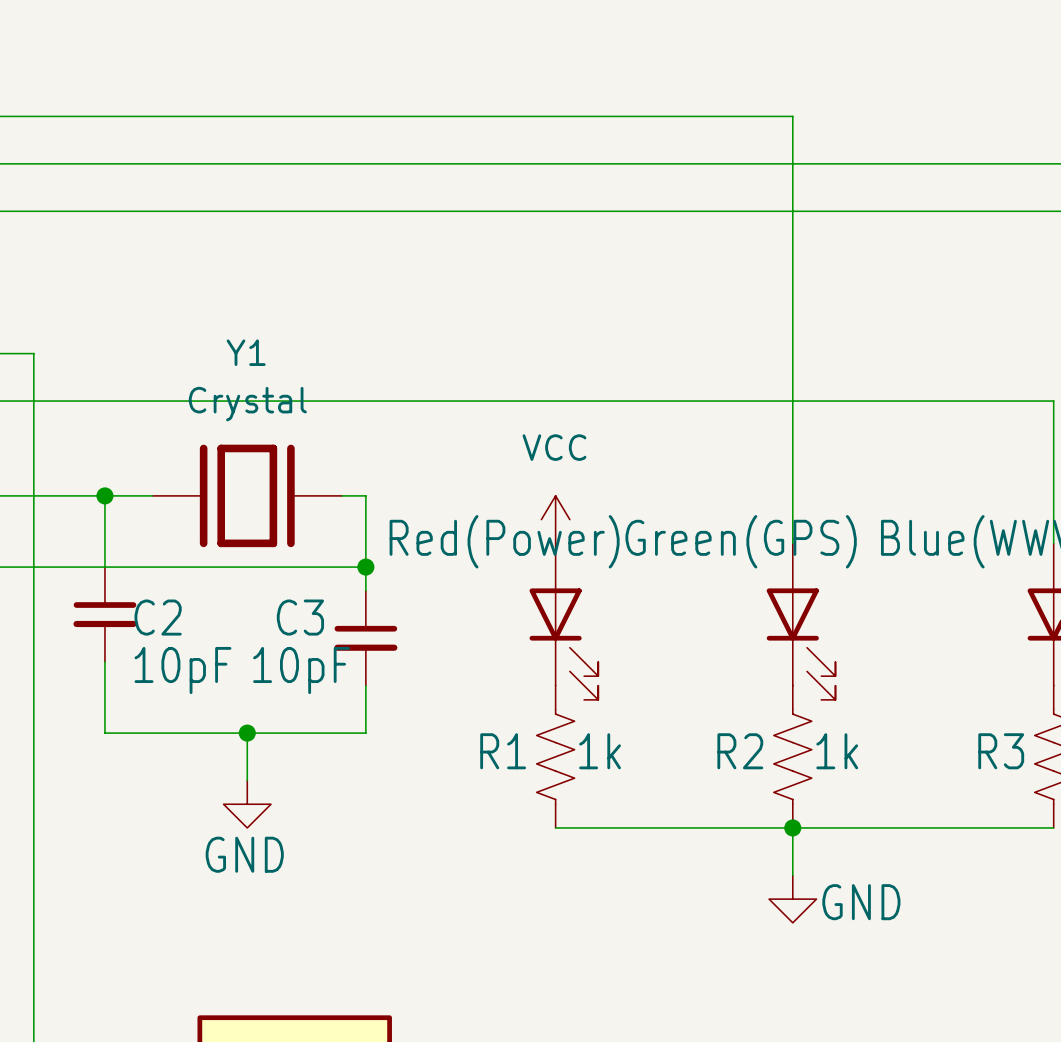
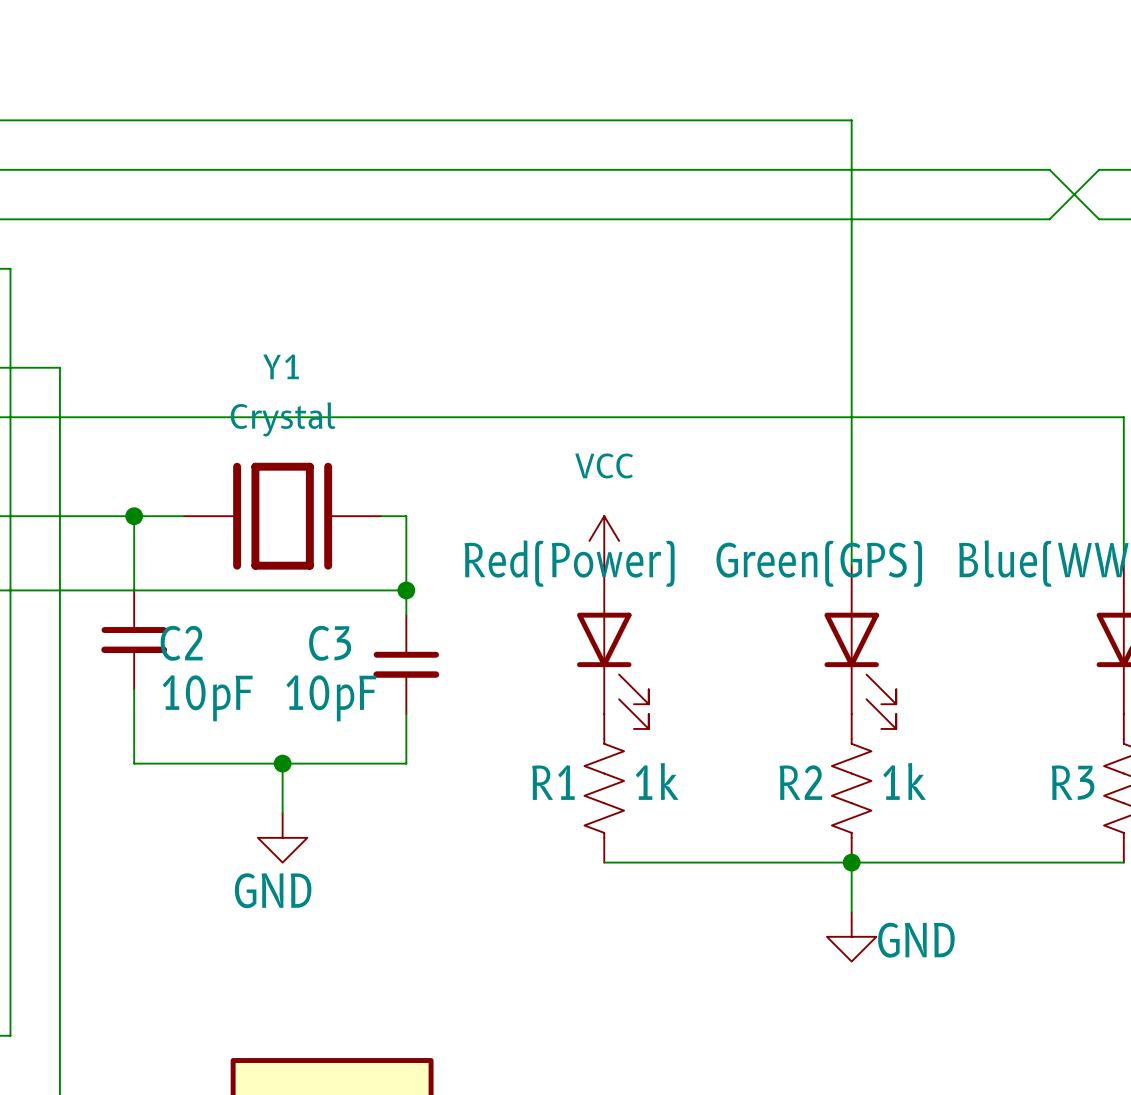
wire: (982, 163) (1029, 163) -> (1049, 169) (1099, 219)
wire: (982, 211) (1029, 211) -> (1049, 219) (1099, 169)

